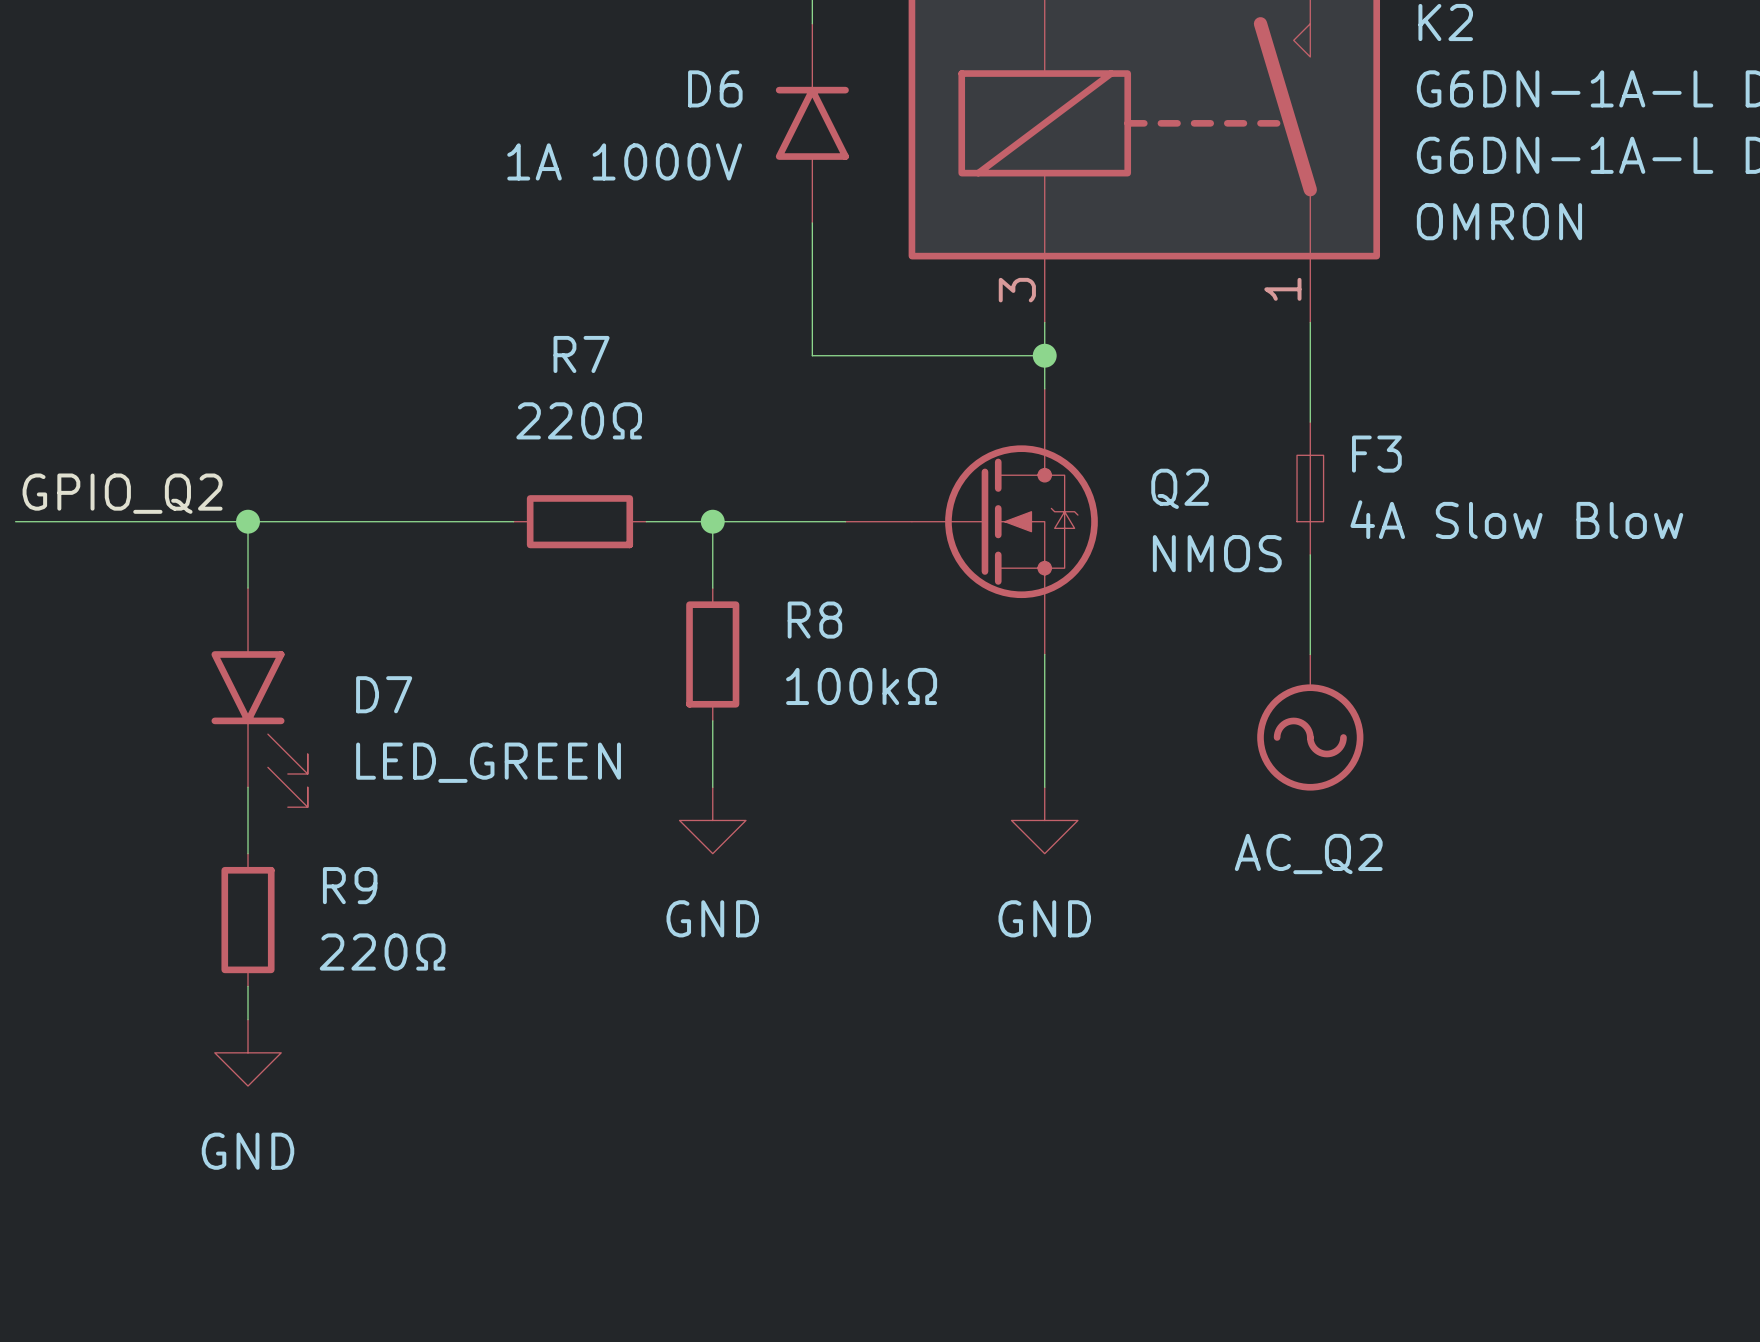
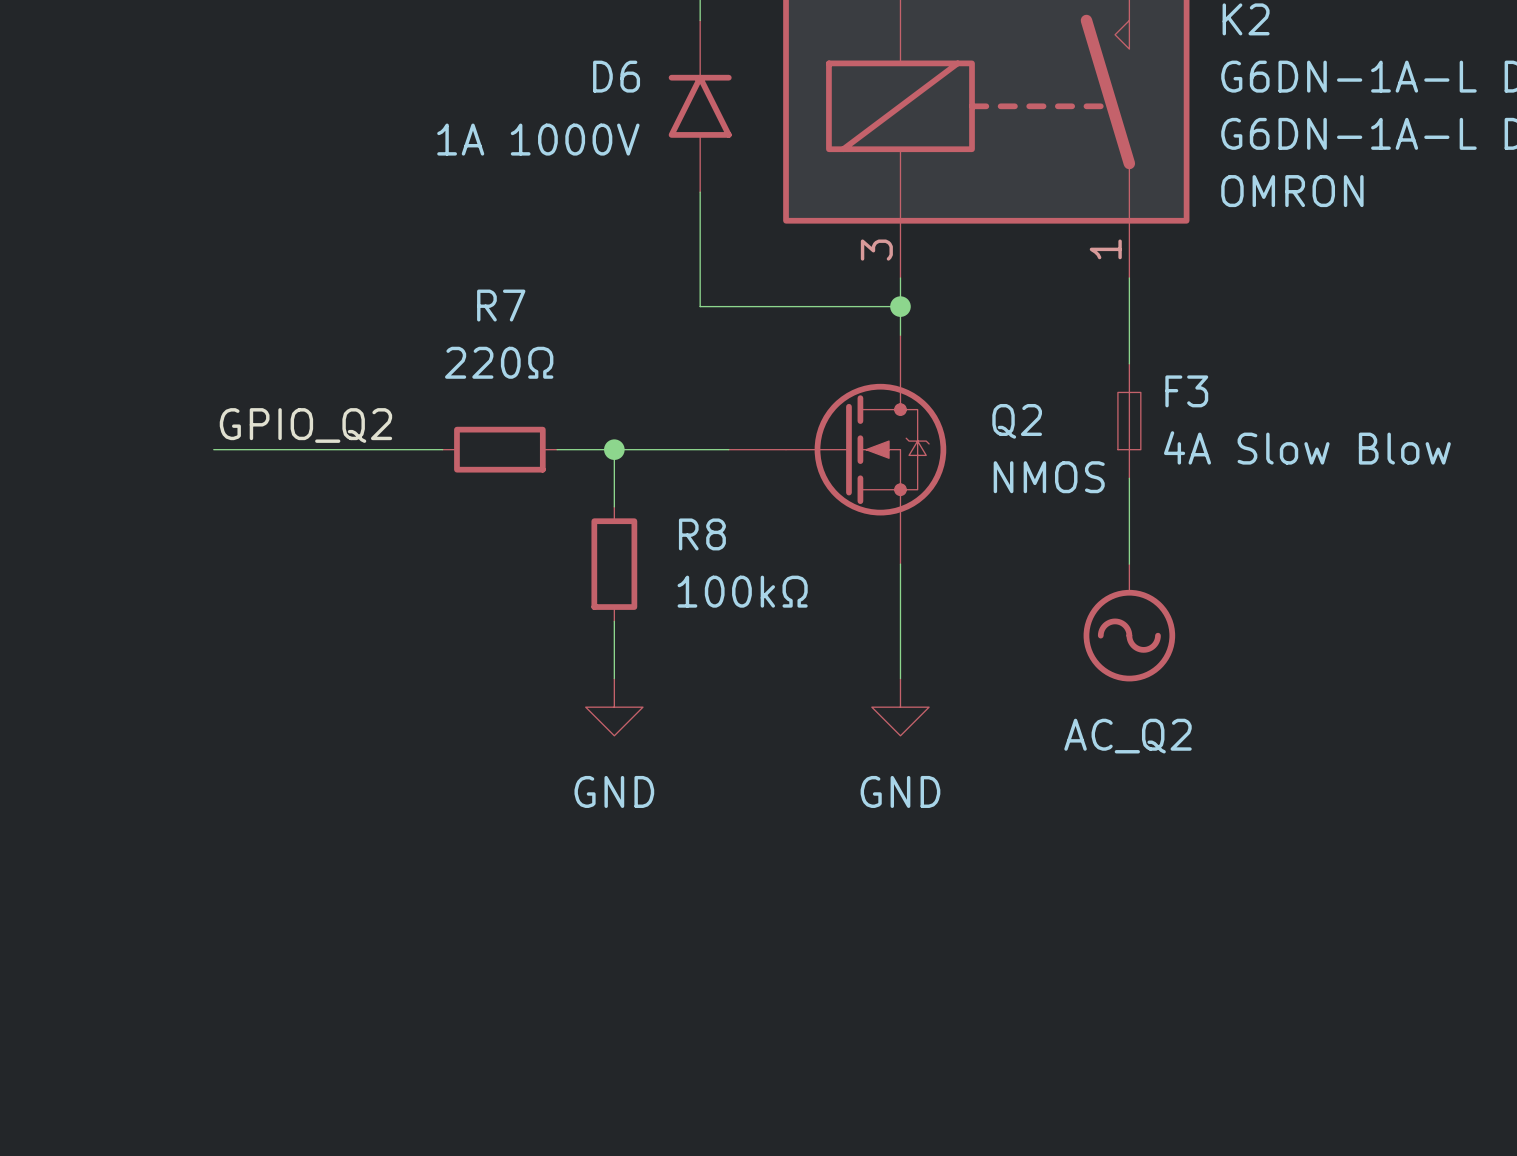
label position: GPIO_Q2 (122, 493) -> GPIO_Q2 (305, 425)
wire: (15, 521) (248, 521) (248, 588) -> none
junction: (248, 521) -> none
D7: (259, 697) -> none
wire: (248, 787) (248, 853) -> none
R9: (248, 920) -> none
wire: (248, 986) (248, 1019) -> none
power symbol: GND (248, 1052) -> none

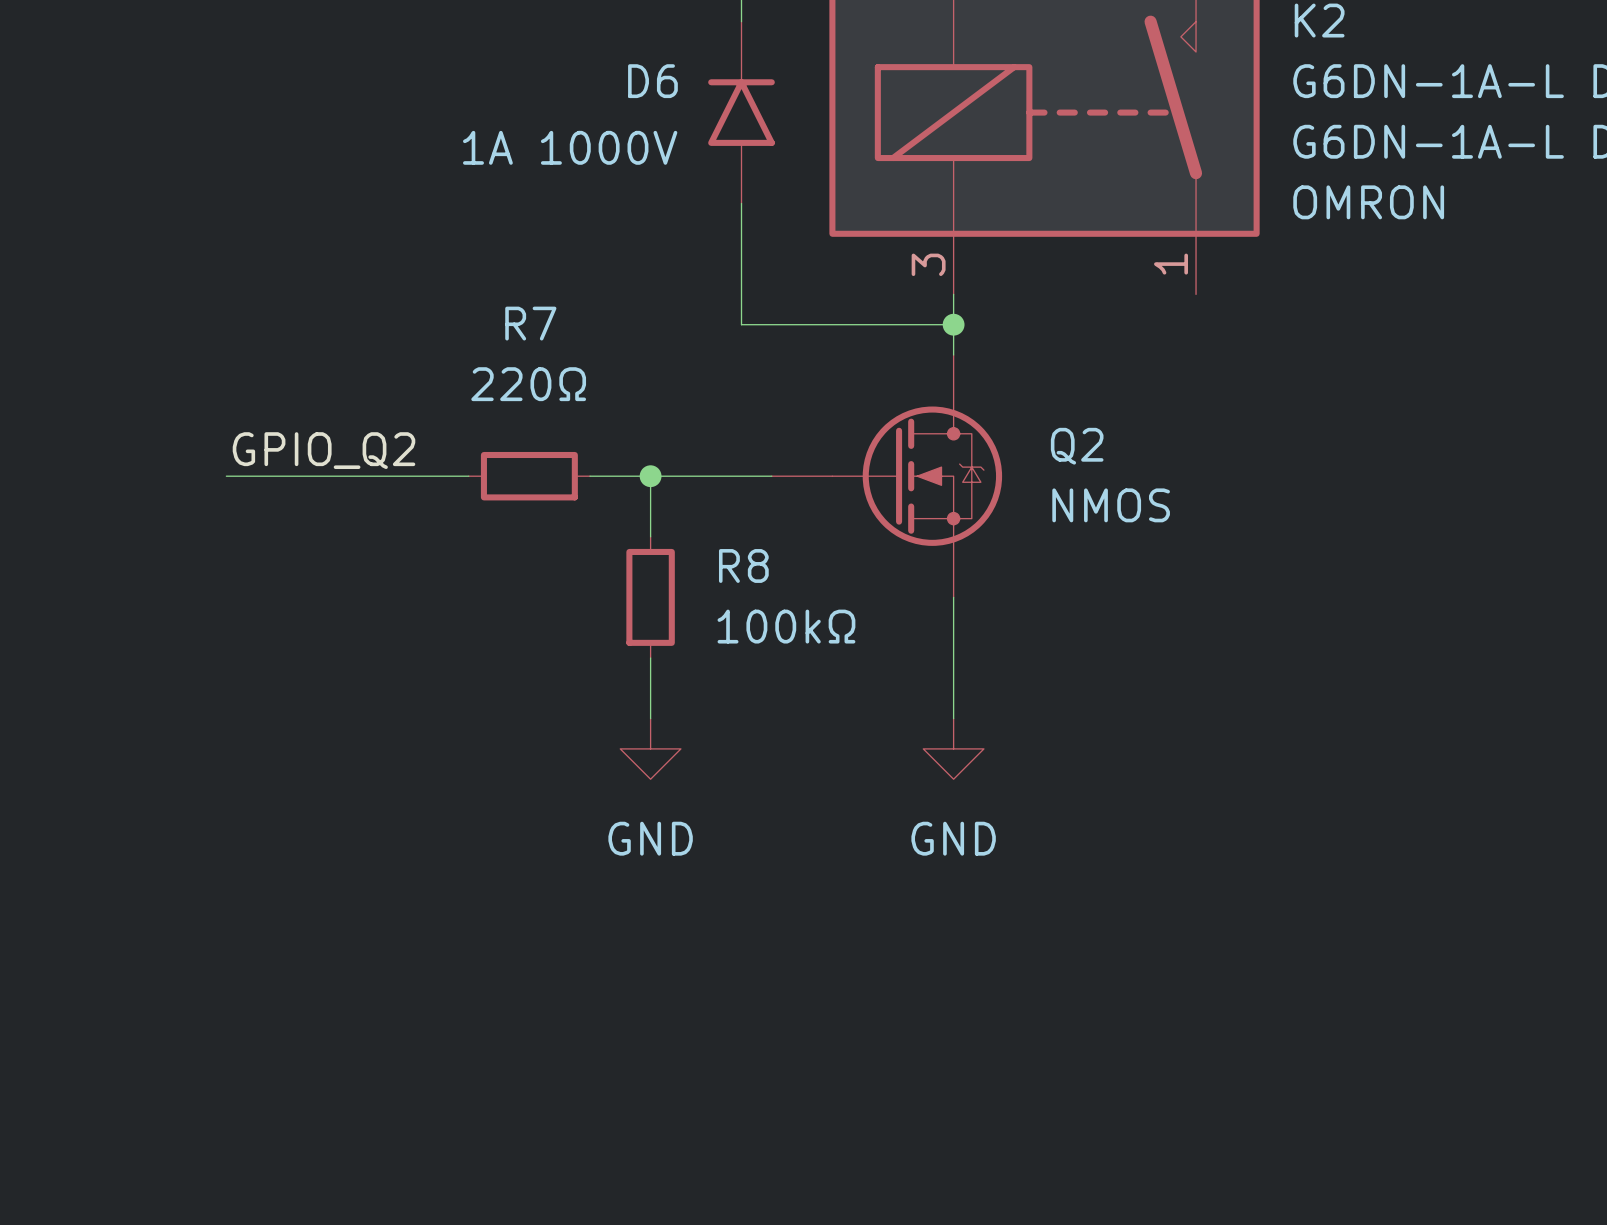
wire: (1129, 277) (1129, 363) -> none
F3: (1129, 421) -> none
wire: (1129, 478) (1129, 564) -> none
power symbol: AC_Q2 (1129, 622) -> none

